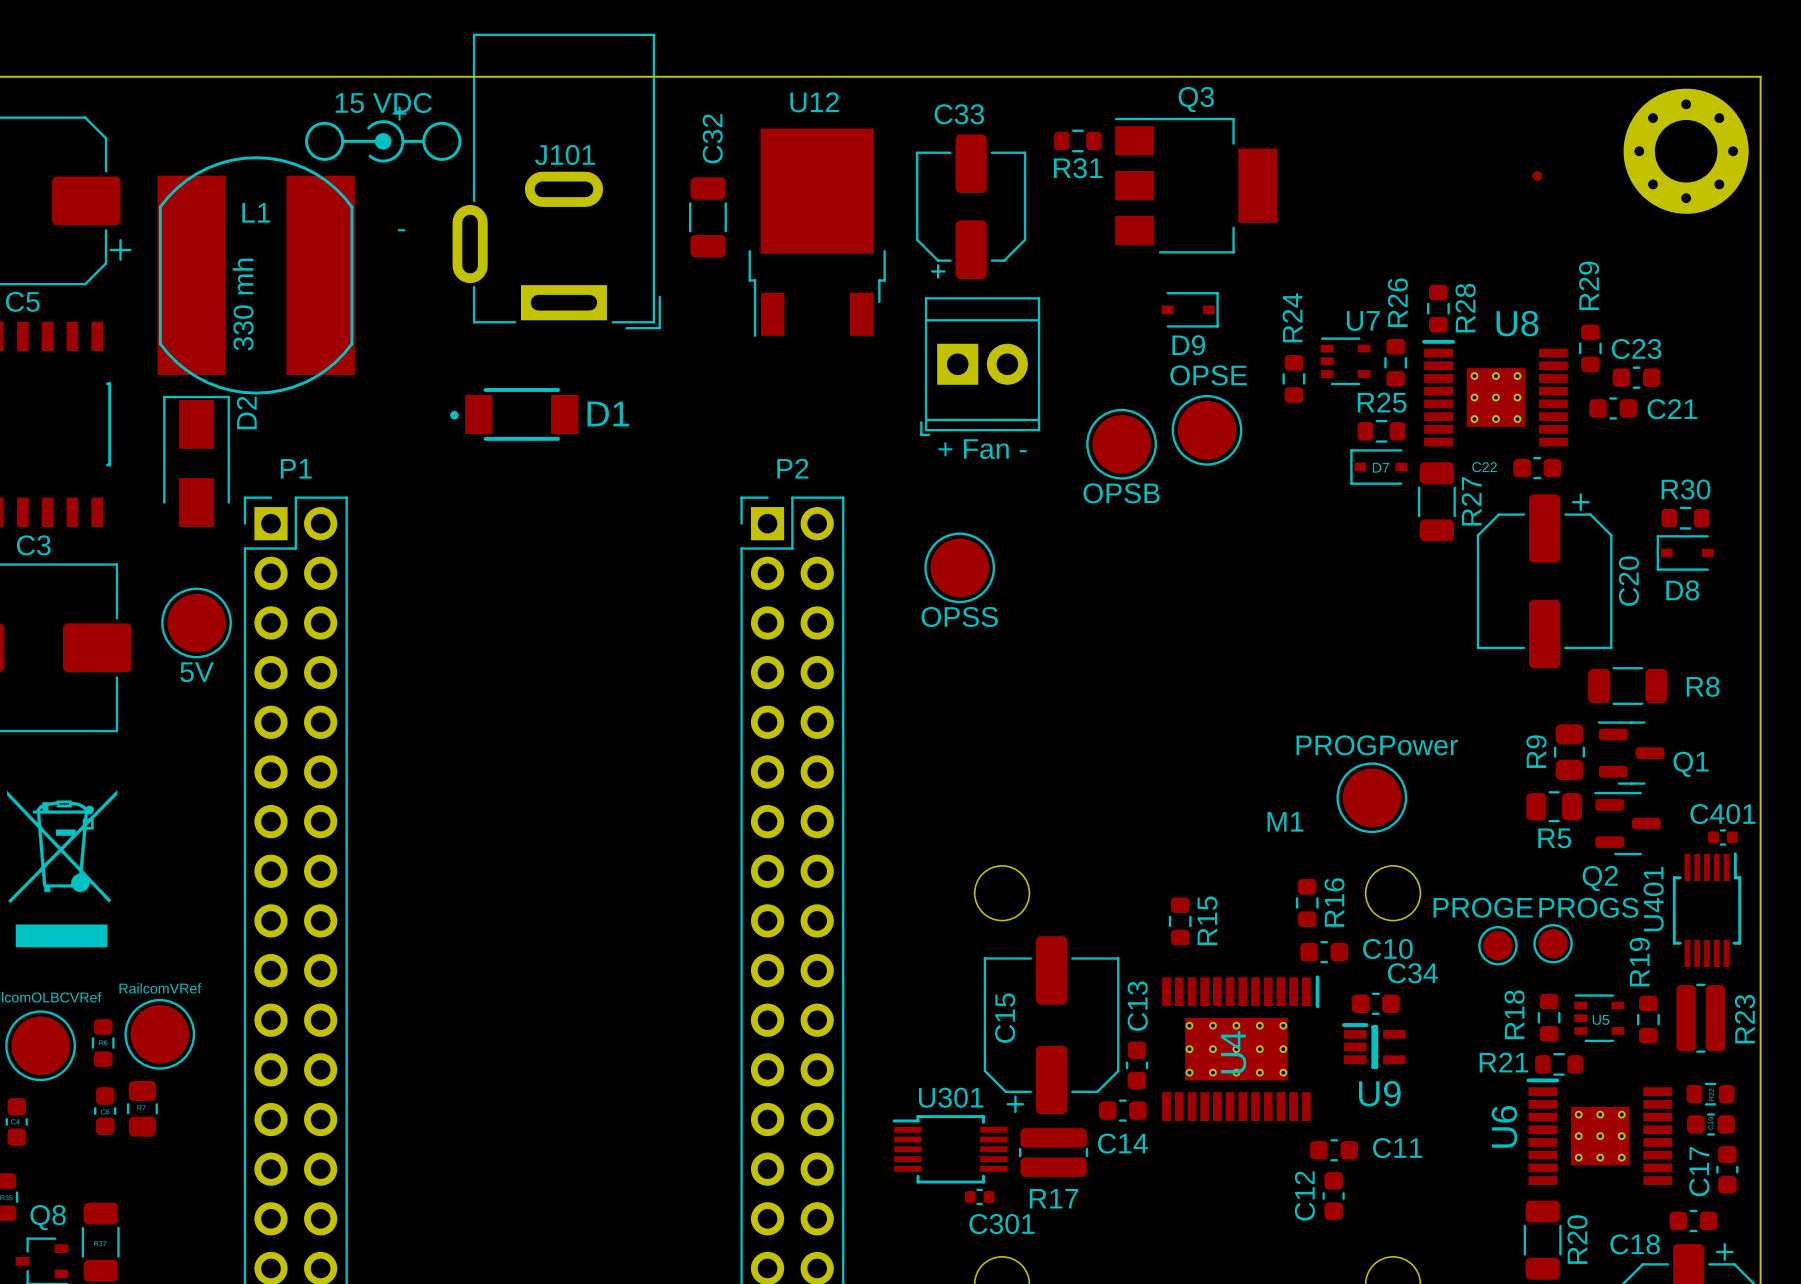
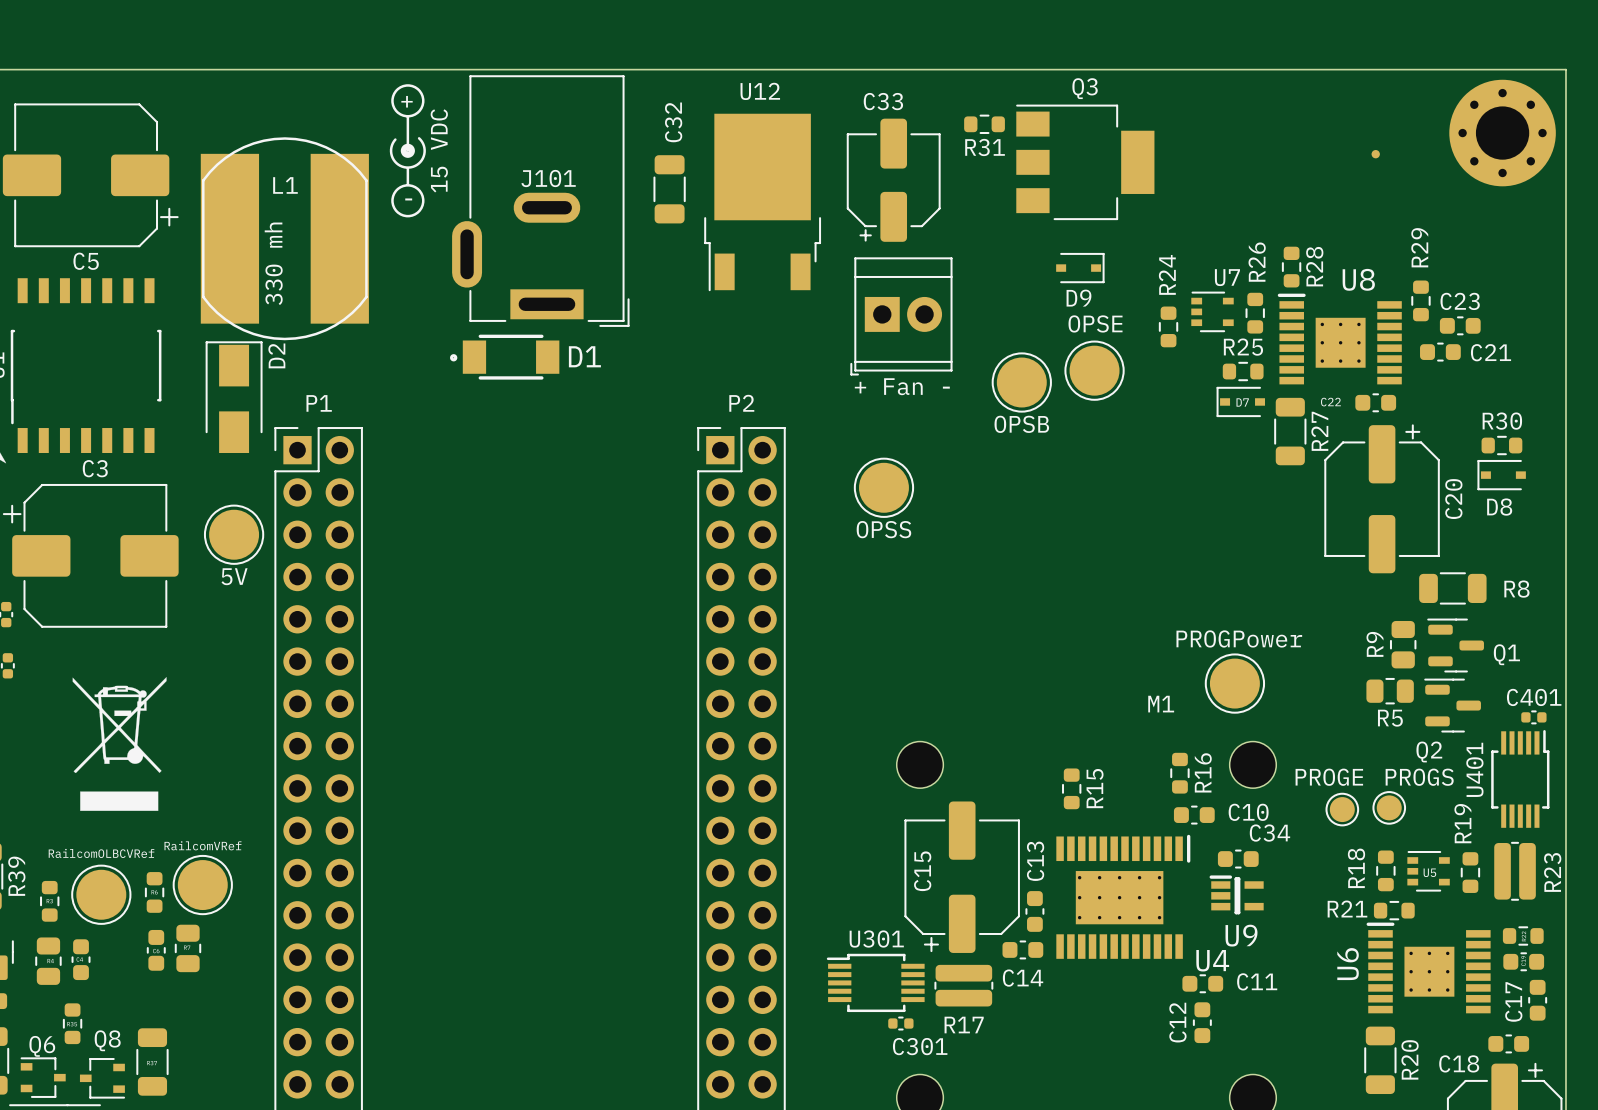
drawing: none -> [389, 84, 426, 218]
drawing: [305, 120, 462, 163] -> none
J101 position: (556, 181) -> (540, 201)
U4 name rotation: 0° (1233, 1052) -> 90° clockwise (1212, 960)
U4 name position: U4 (1233, 1052) -> U4 (1212, 960)

